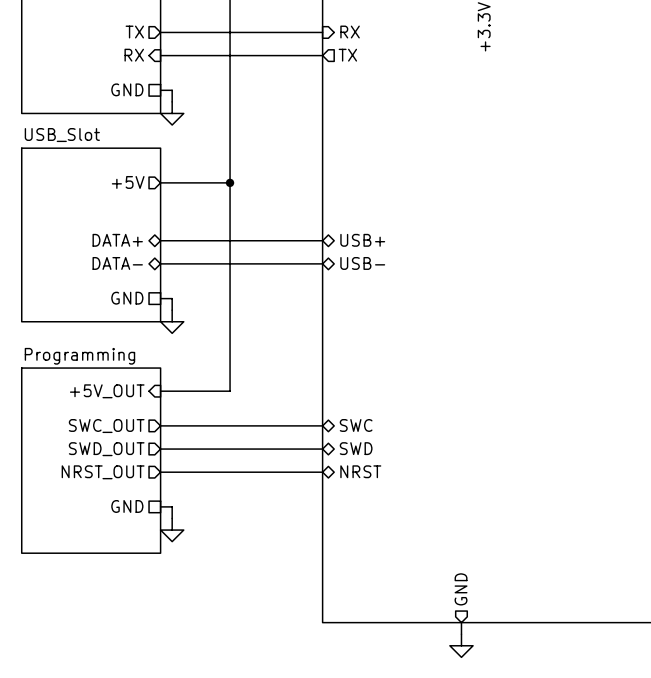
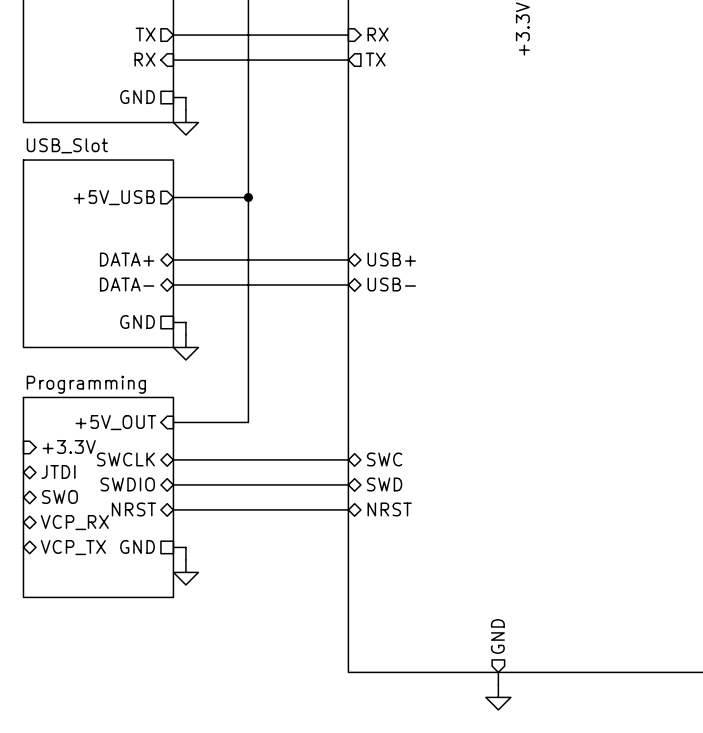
sheet pin: +5V (128, 182) -> +5V_USB (114, 197)
sheet pin: none -> +3.3V (69, 446)
sheet pin shape: output (106, 426) -> bidirectional (125, 459)
sheet pin: SWC_OUT (106, 426) -> SWCLK (125, 459)
sheet pin: none -> JTDI (58, 471)
sheet pin shape: output (106, 449) -> bidirectional (127, 484)
sheet pin: SWD_OUT (106, 449) -> SWDIO (127, 484)
sheet pin: none -> SWO (59, 496)
sheet pin shape: output (103, 472) -> bidirectional (133, 509)
sheet pin: NRST_OUT (103, 472) -> NRST (133, 509)
sheet pin: none -> VCP_RX (74, 522)
sheet pin: none -> VCP_TX (73, 547)

